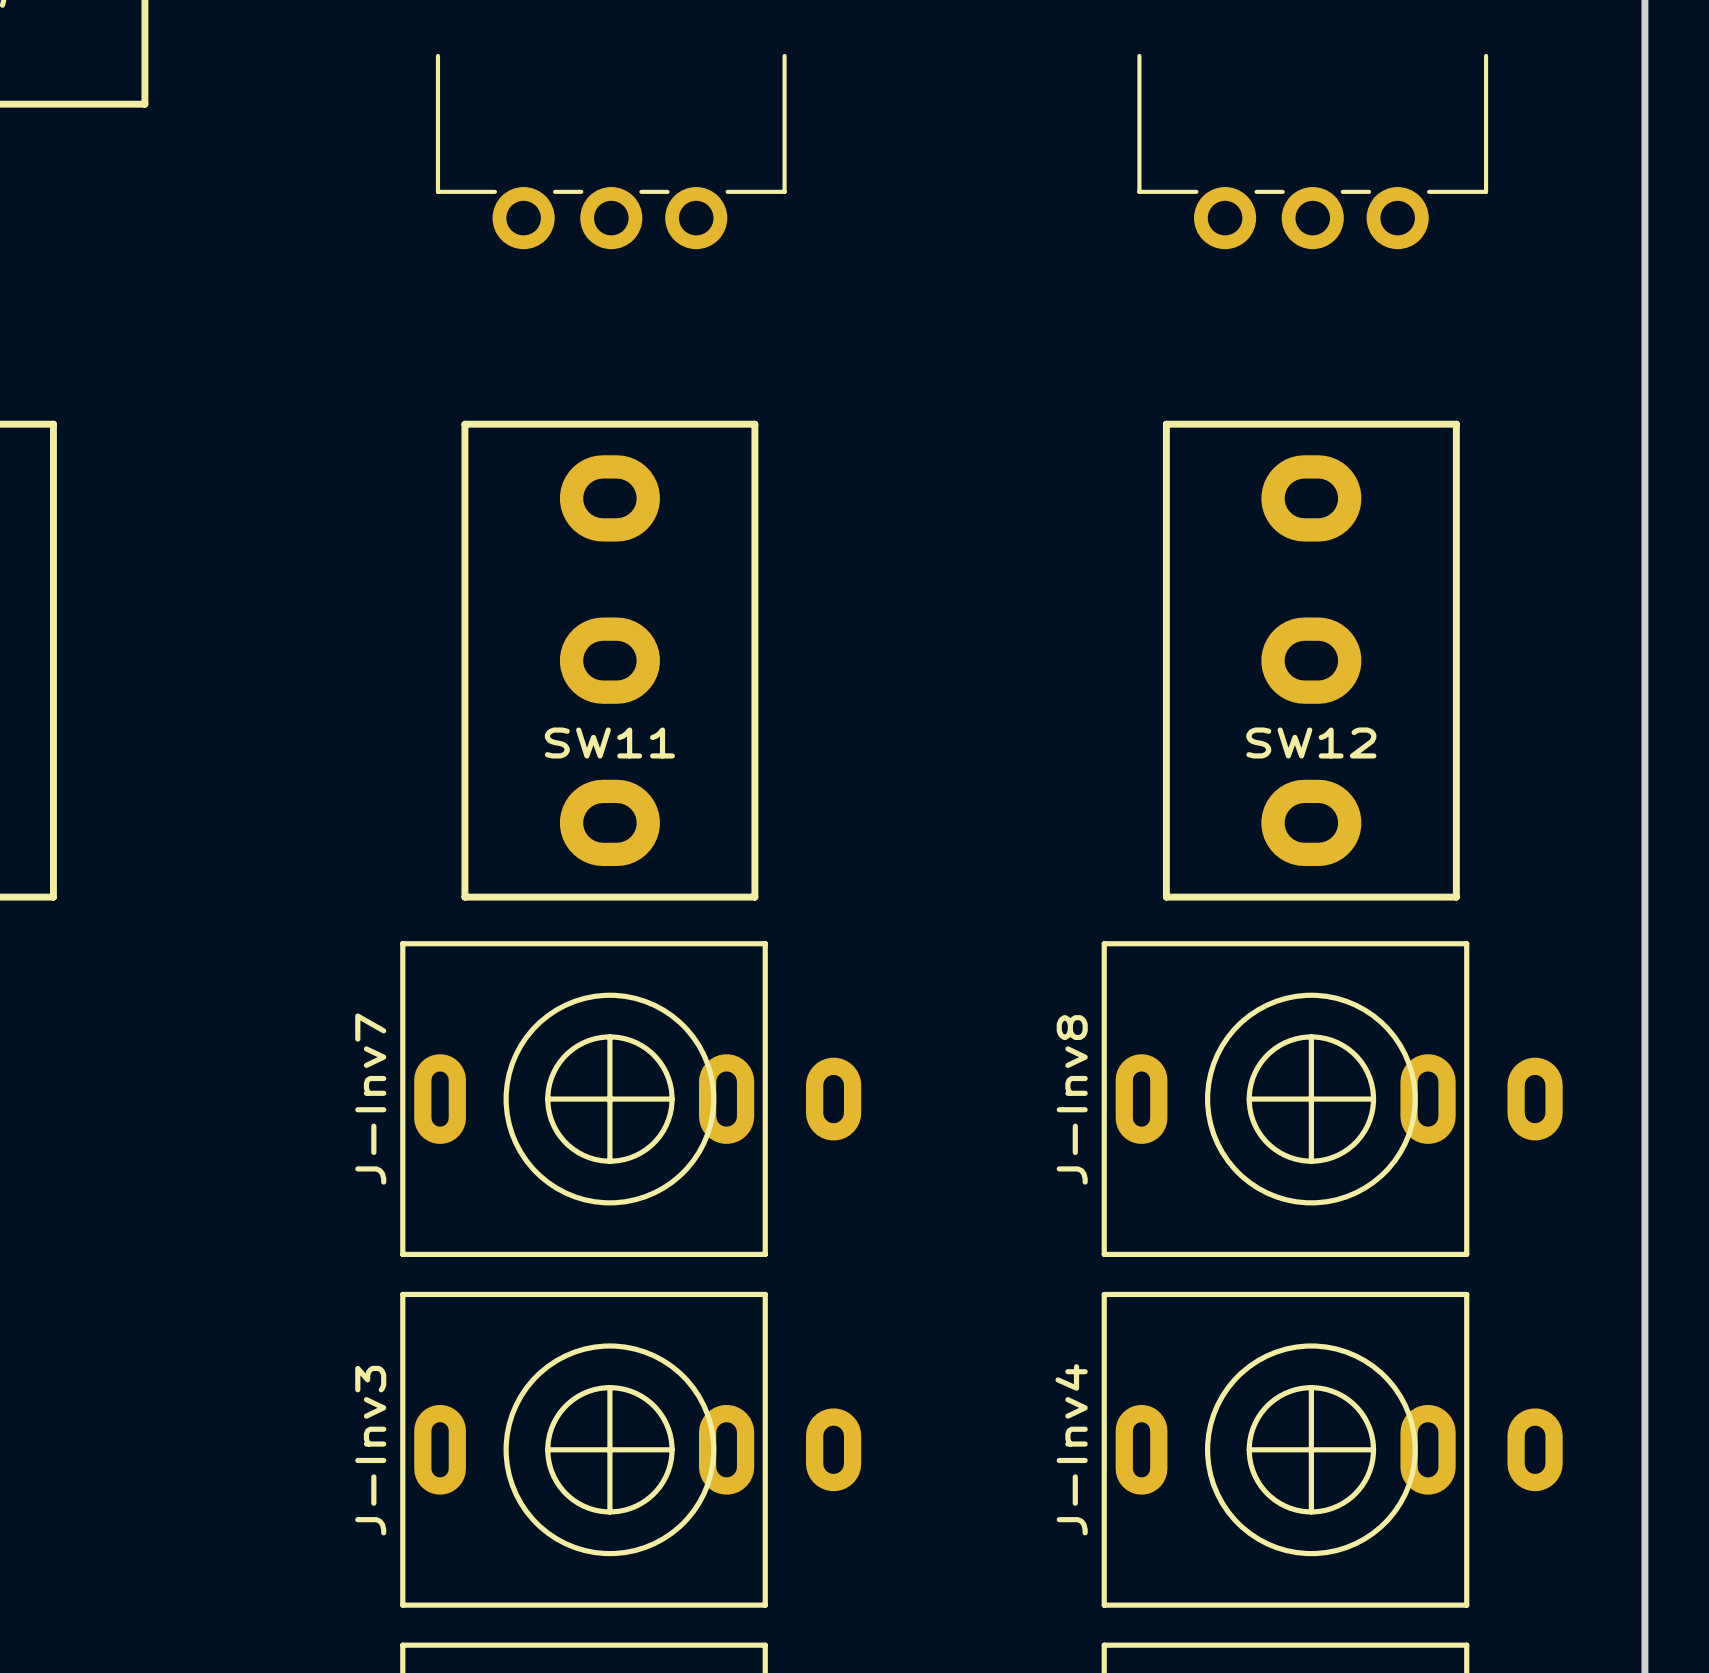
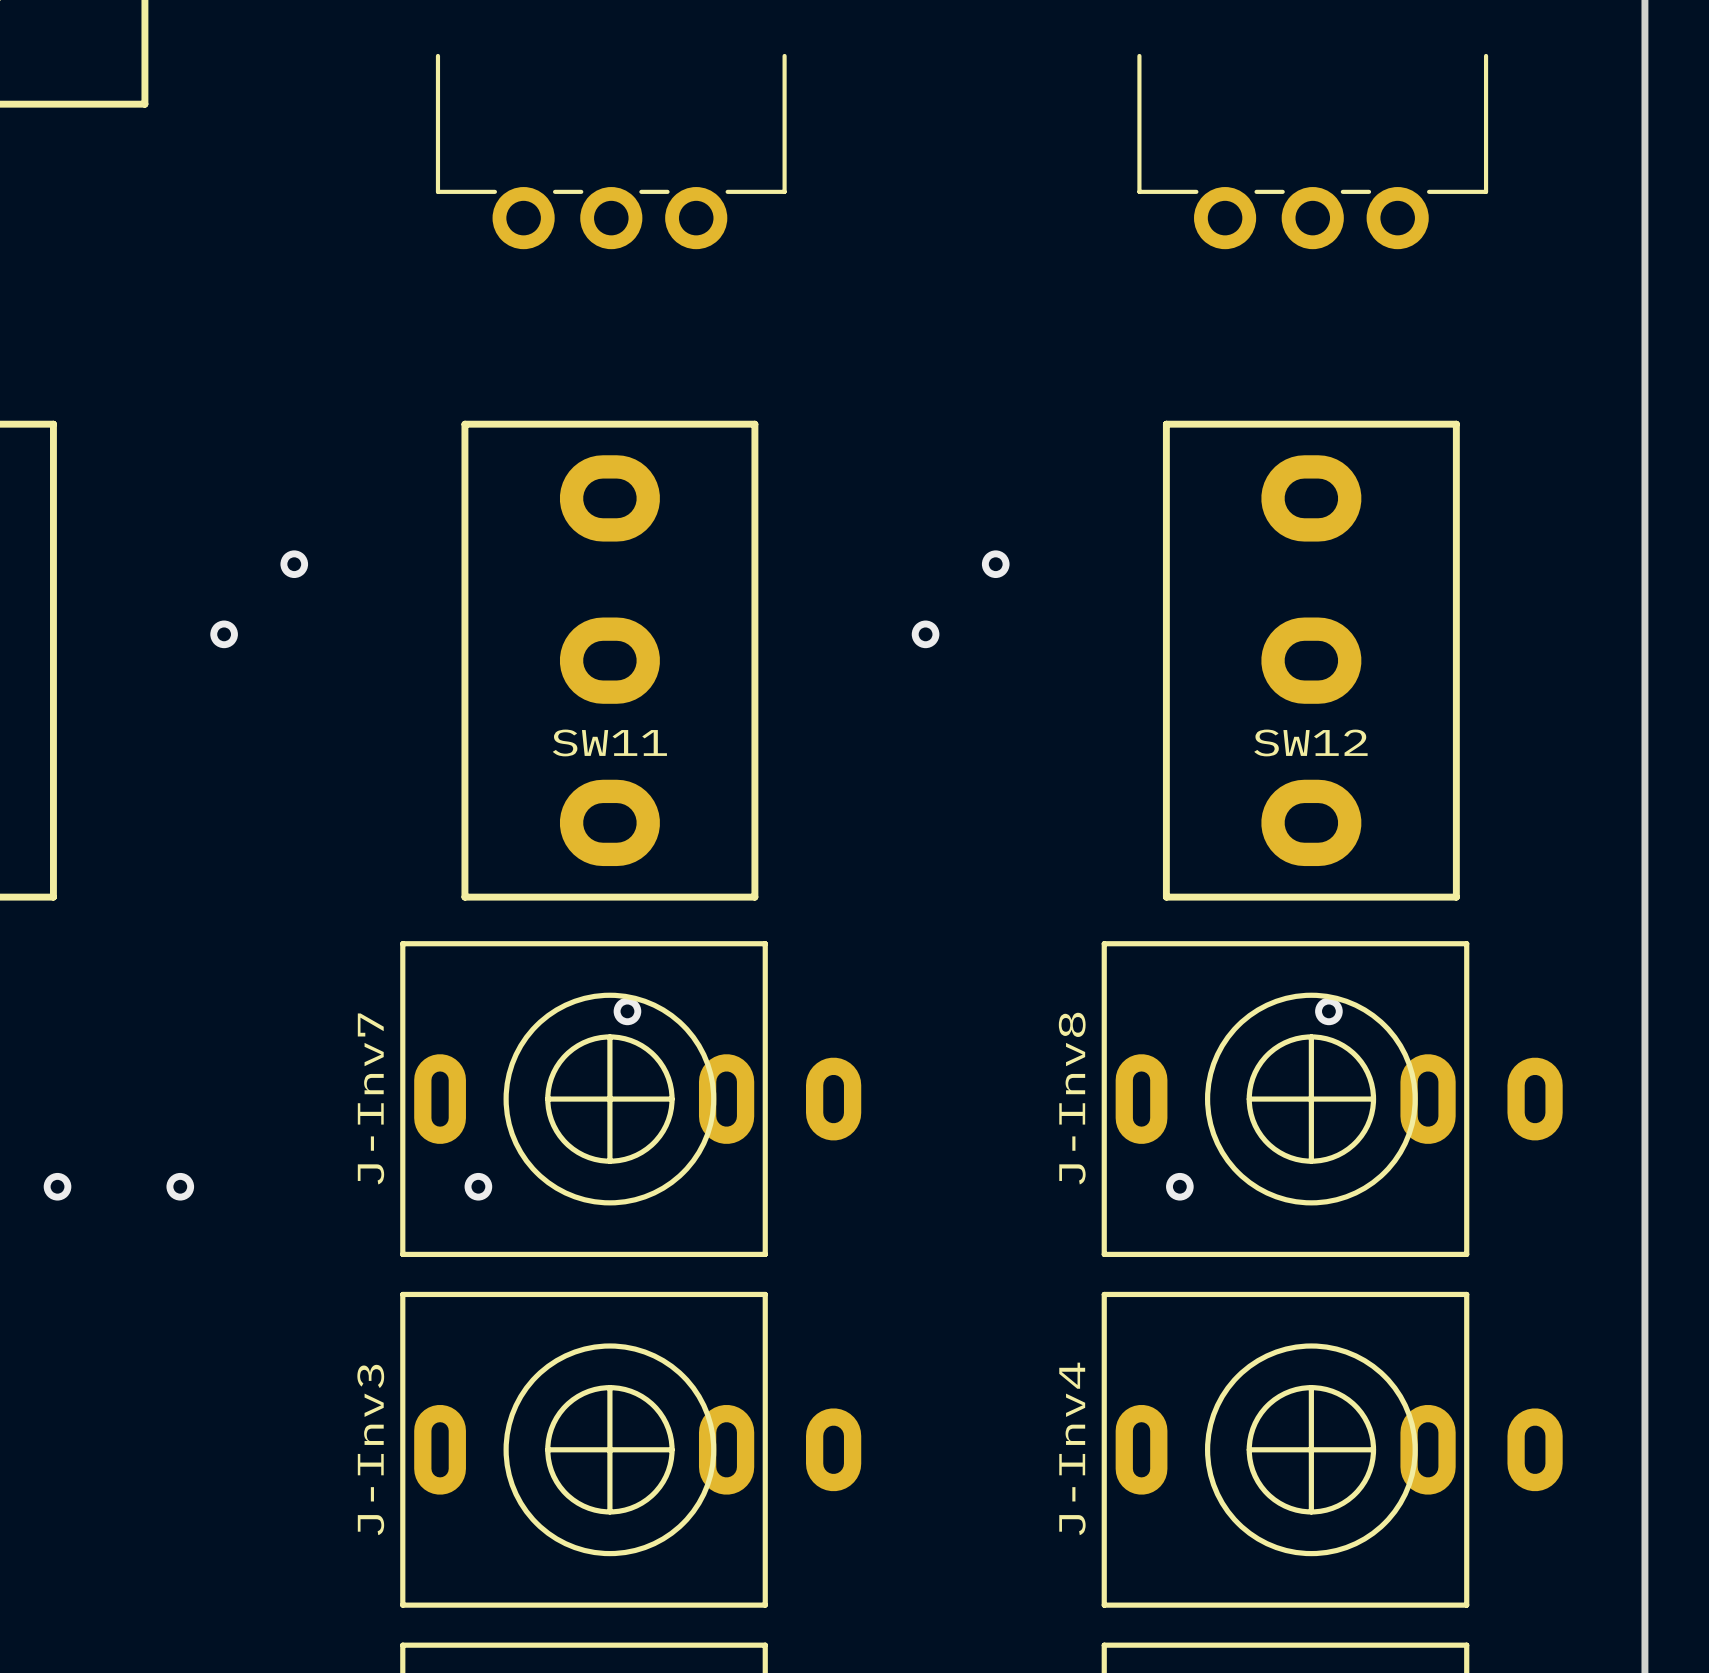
via: none -> (294, 564)
via: none -> (995, 564)
via: none -> (224, 634)
via: none -> (925, 634)
via: none -> (627, 1011)
via: none -> (1328, 1011)
via: none -> (57, 1186)
via: none -> (180, 1186)
via: none -> (478, 1186)
via: none -> (1179, 1186)

